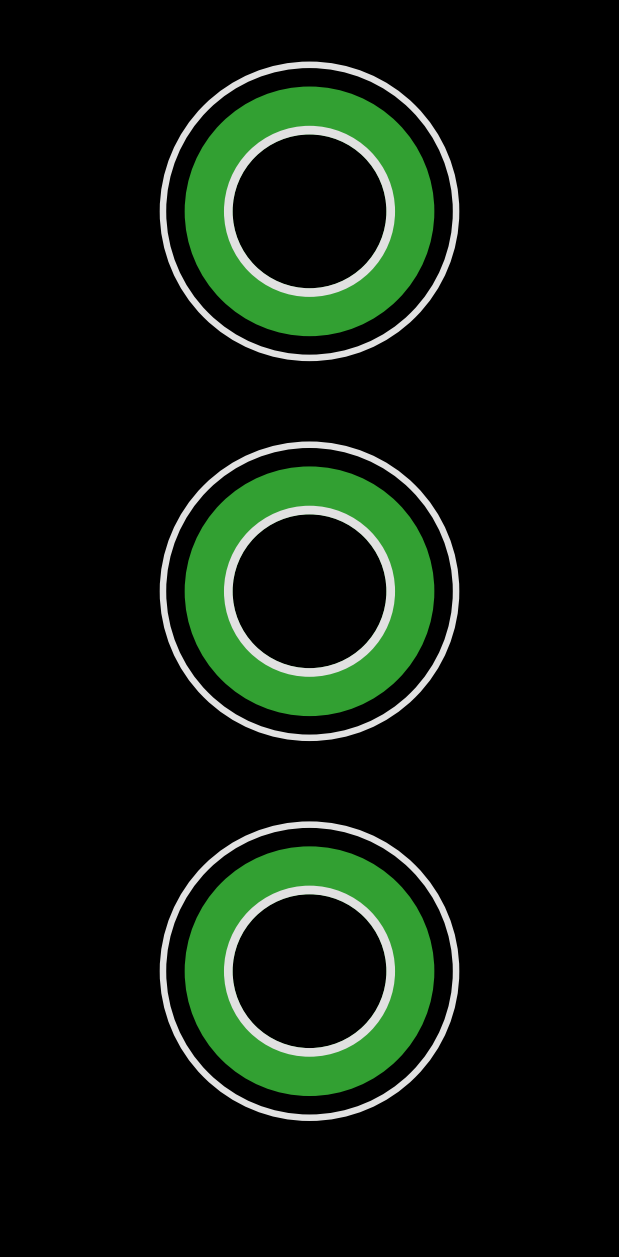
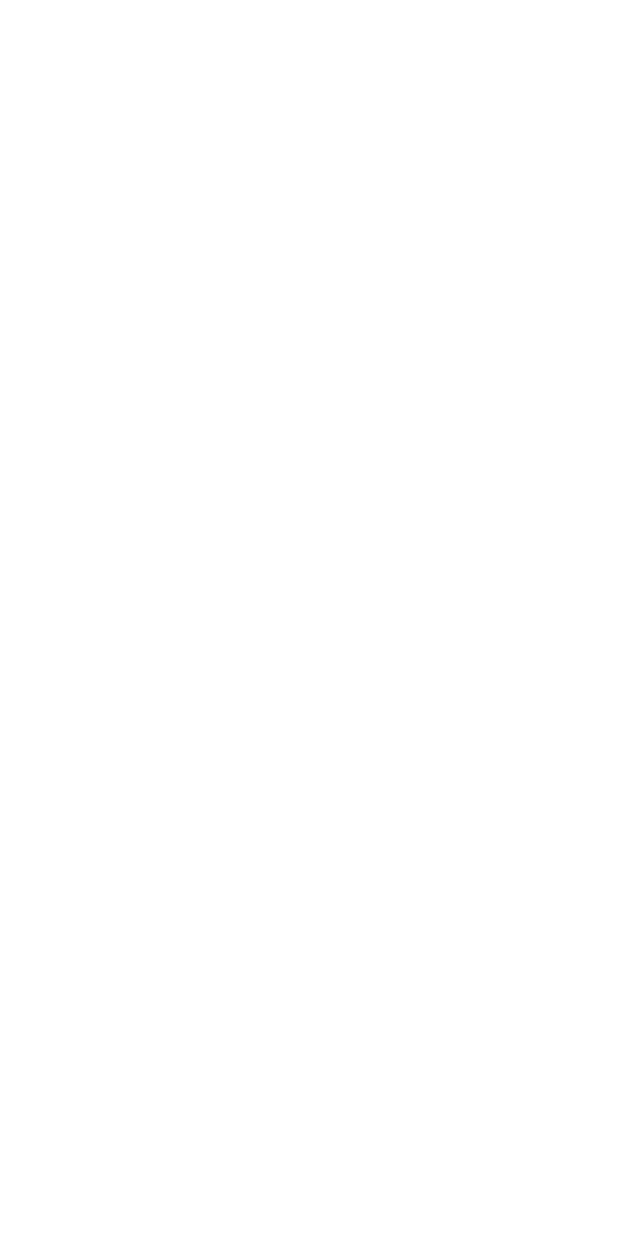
part: (309, 211) -> none
part: (309, 591) -> none
part: (309, 971) -> none

